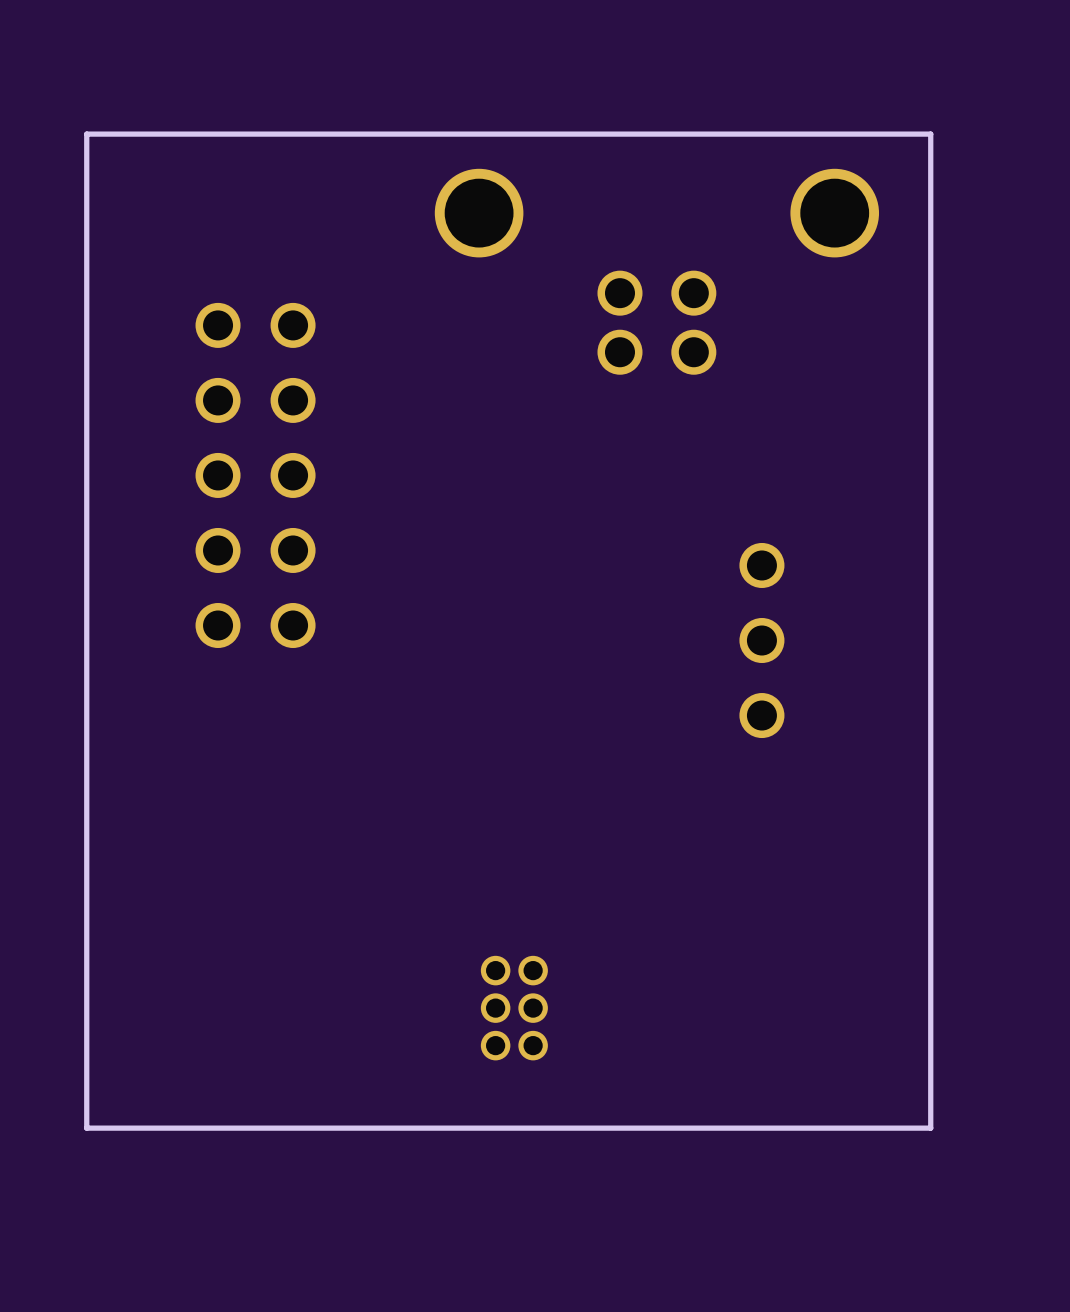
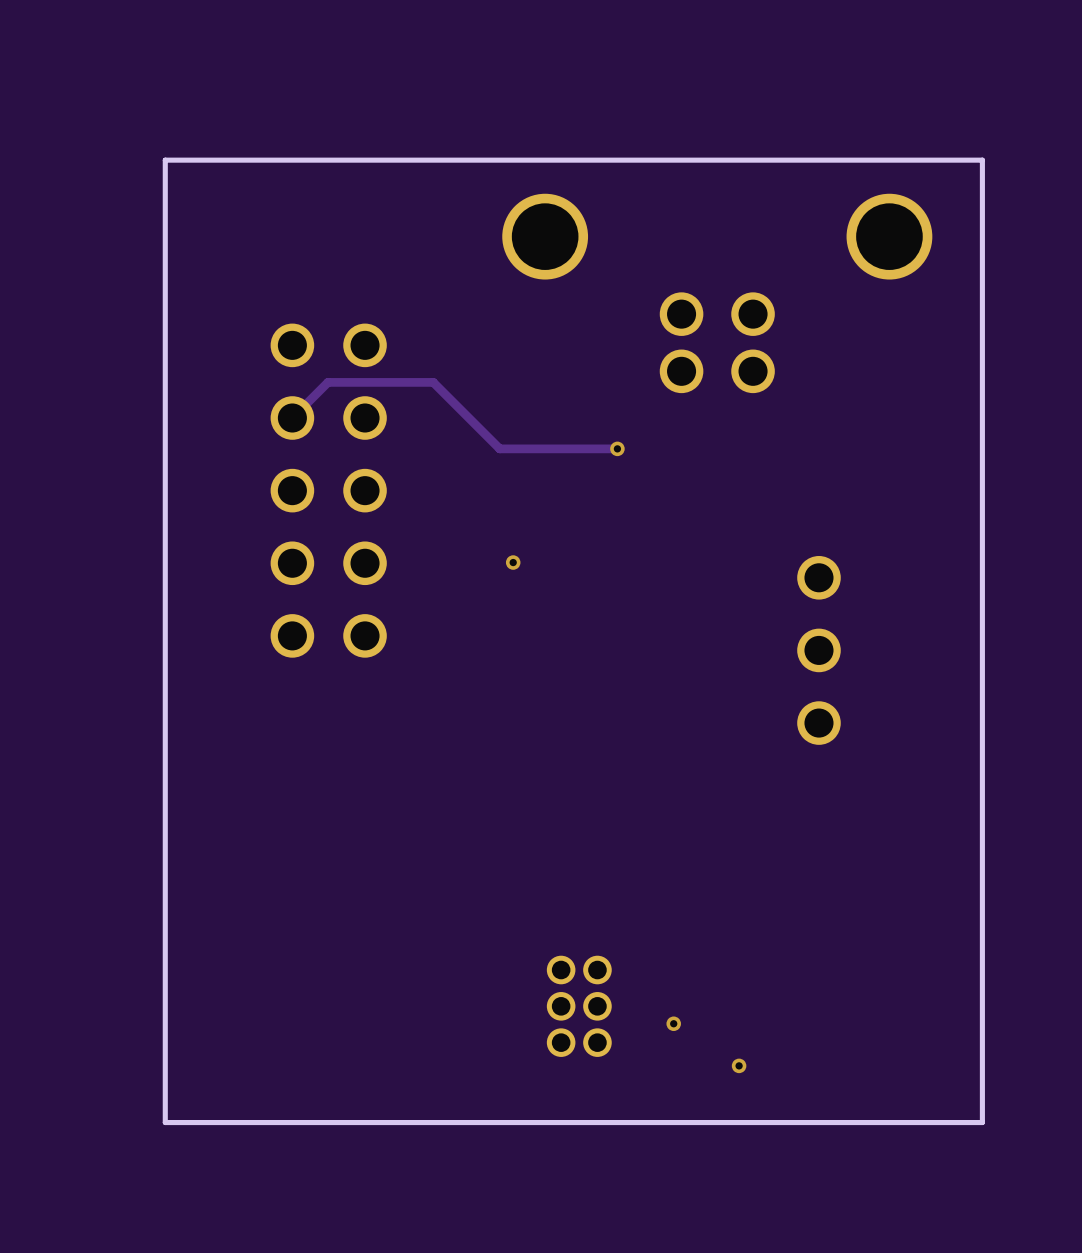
track: none -> (292, 418) (327, 382) (433, 382) (499, 448) (617, 448)
via: none -> (617, 448)
via: none -> (513, 562)
via: none -> (673, 1023)
via: none -> (739, 1065)

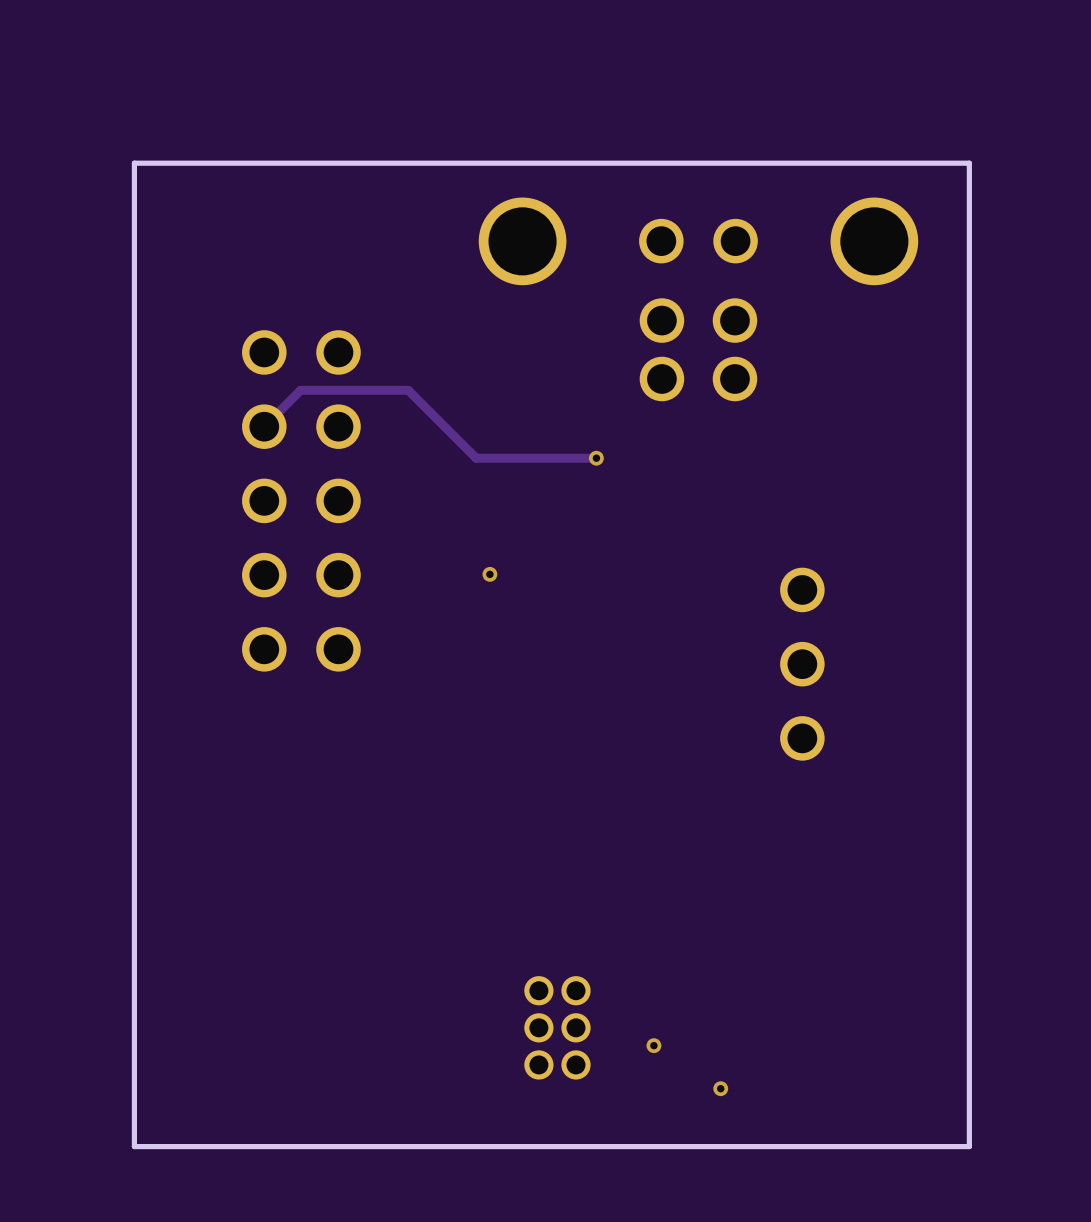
part: none -> (698, 241)

